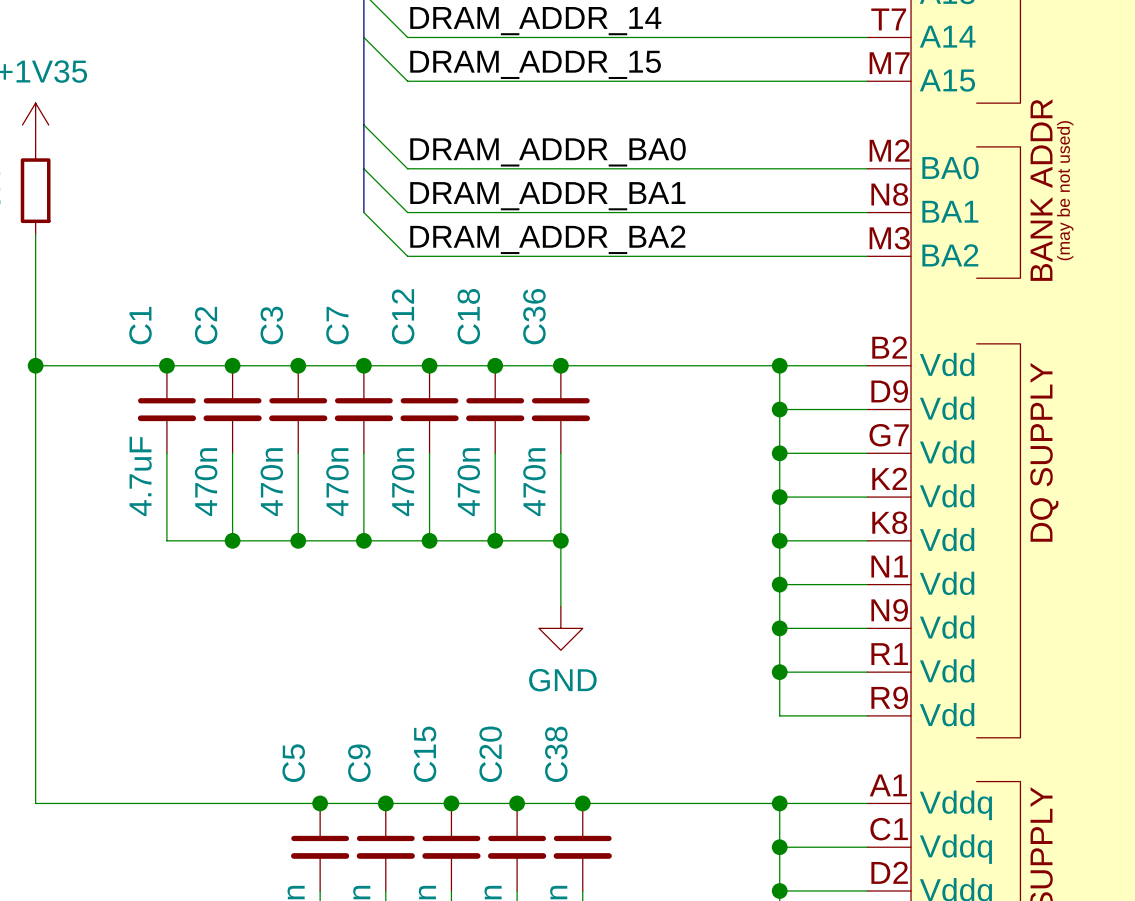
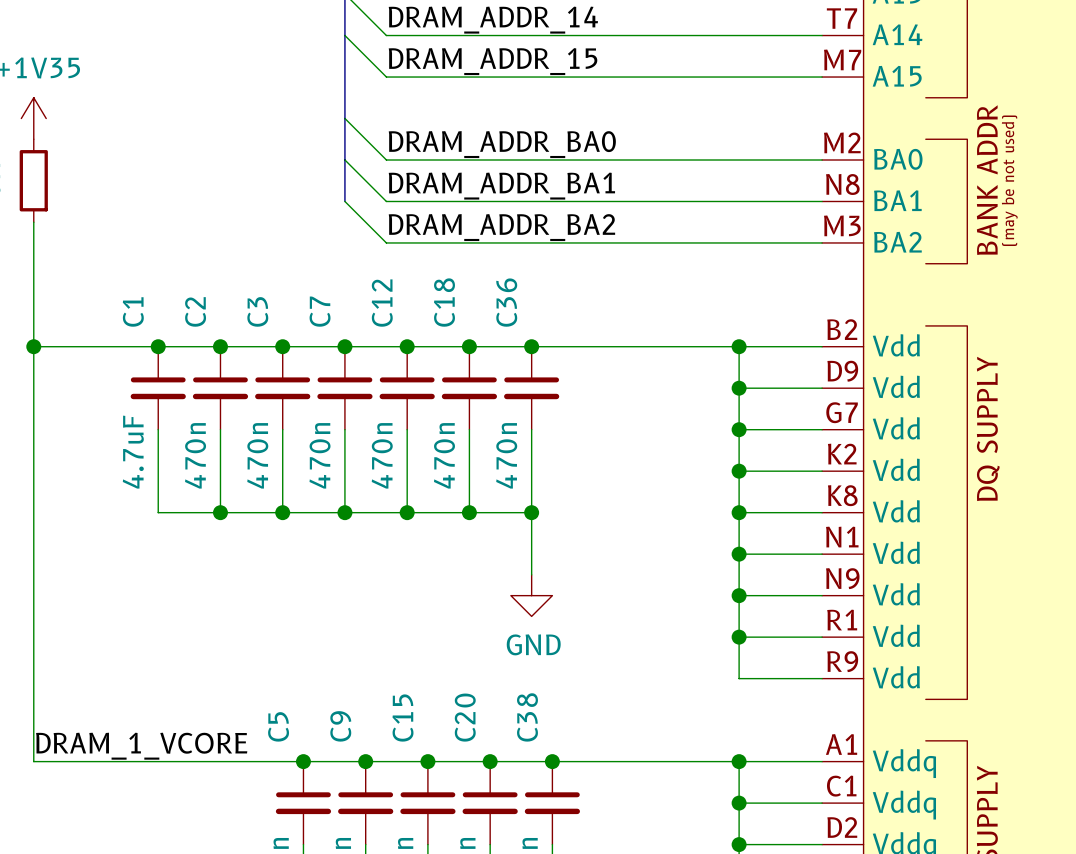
label: none -> DRAM_1_VCORE (141, 746)

